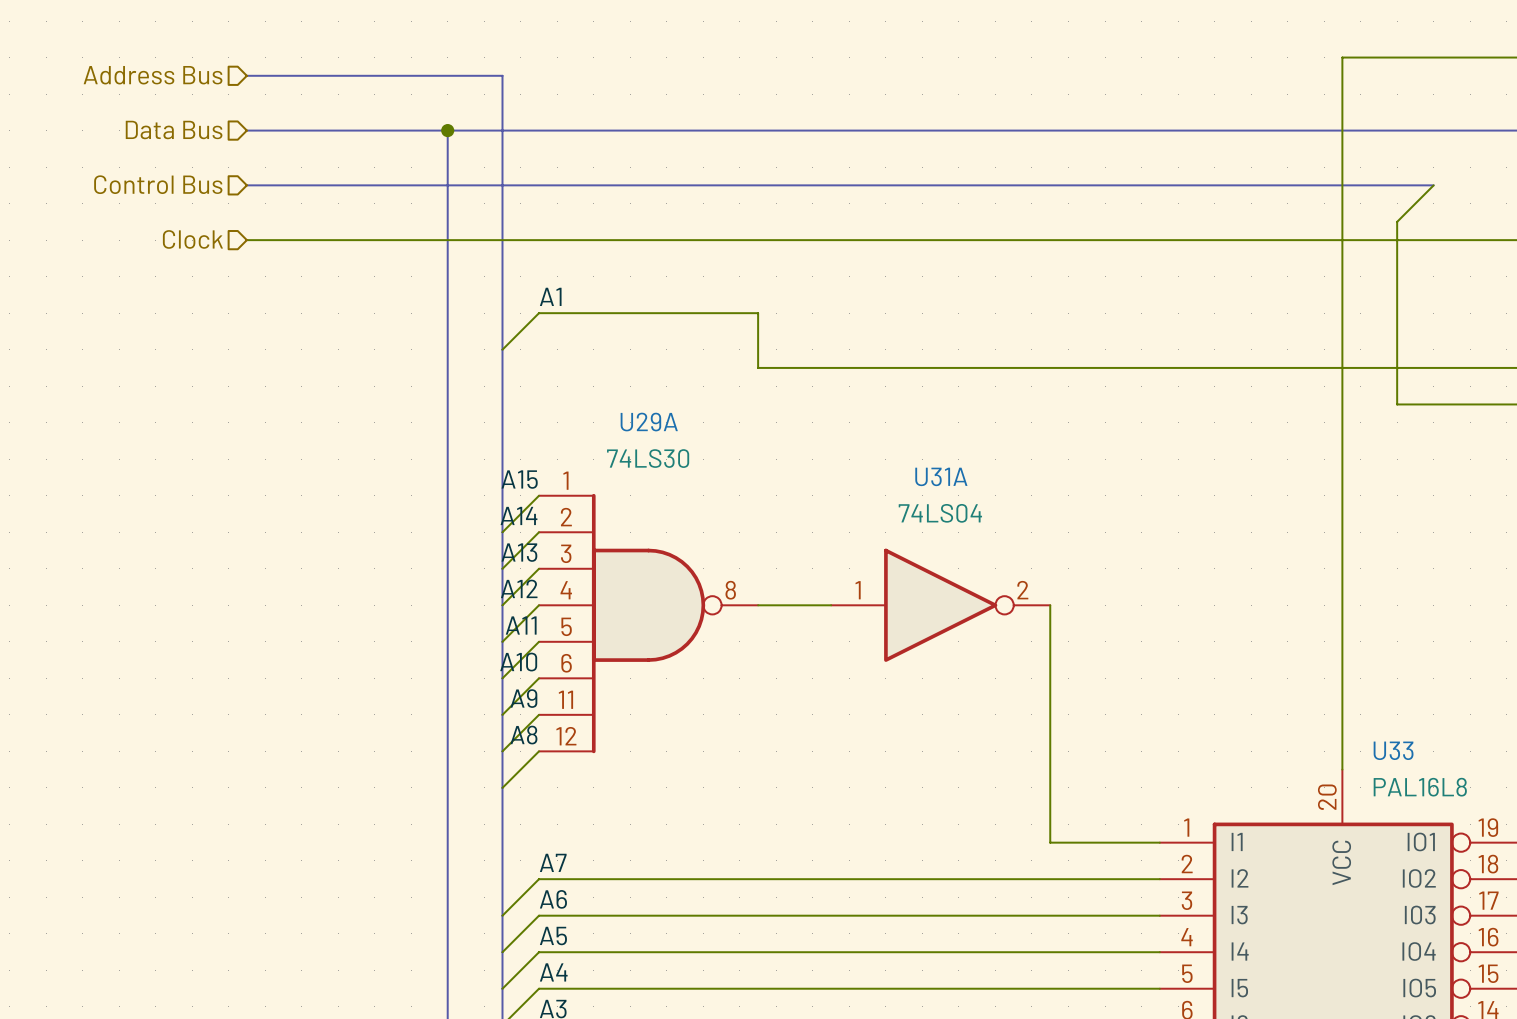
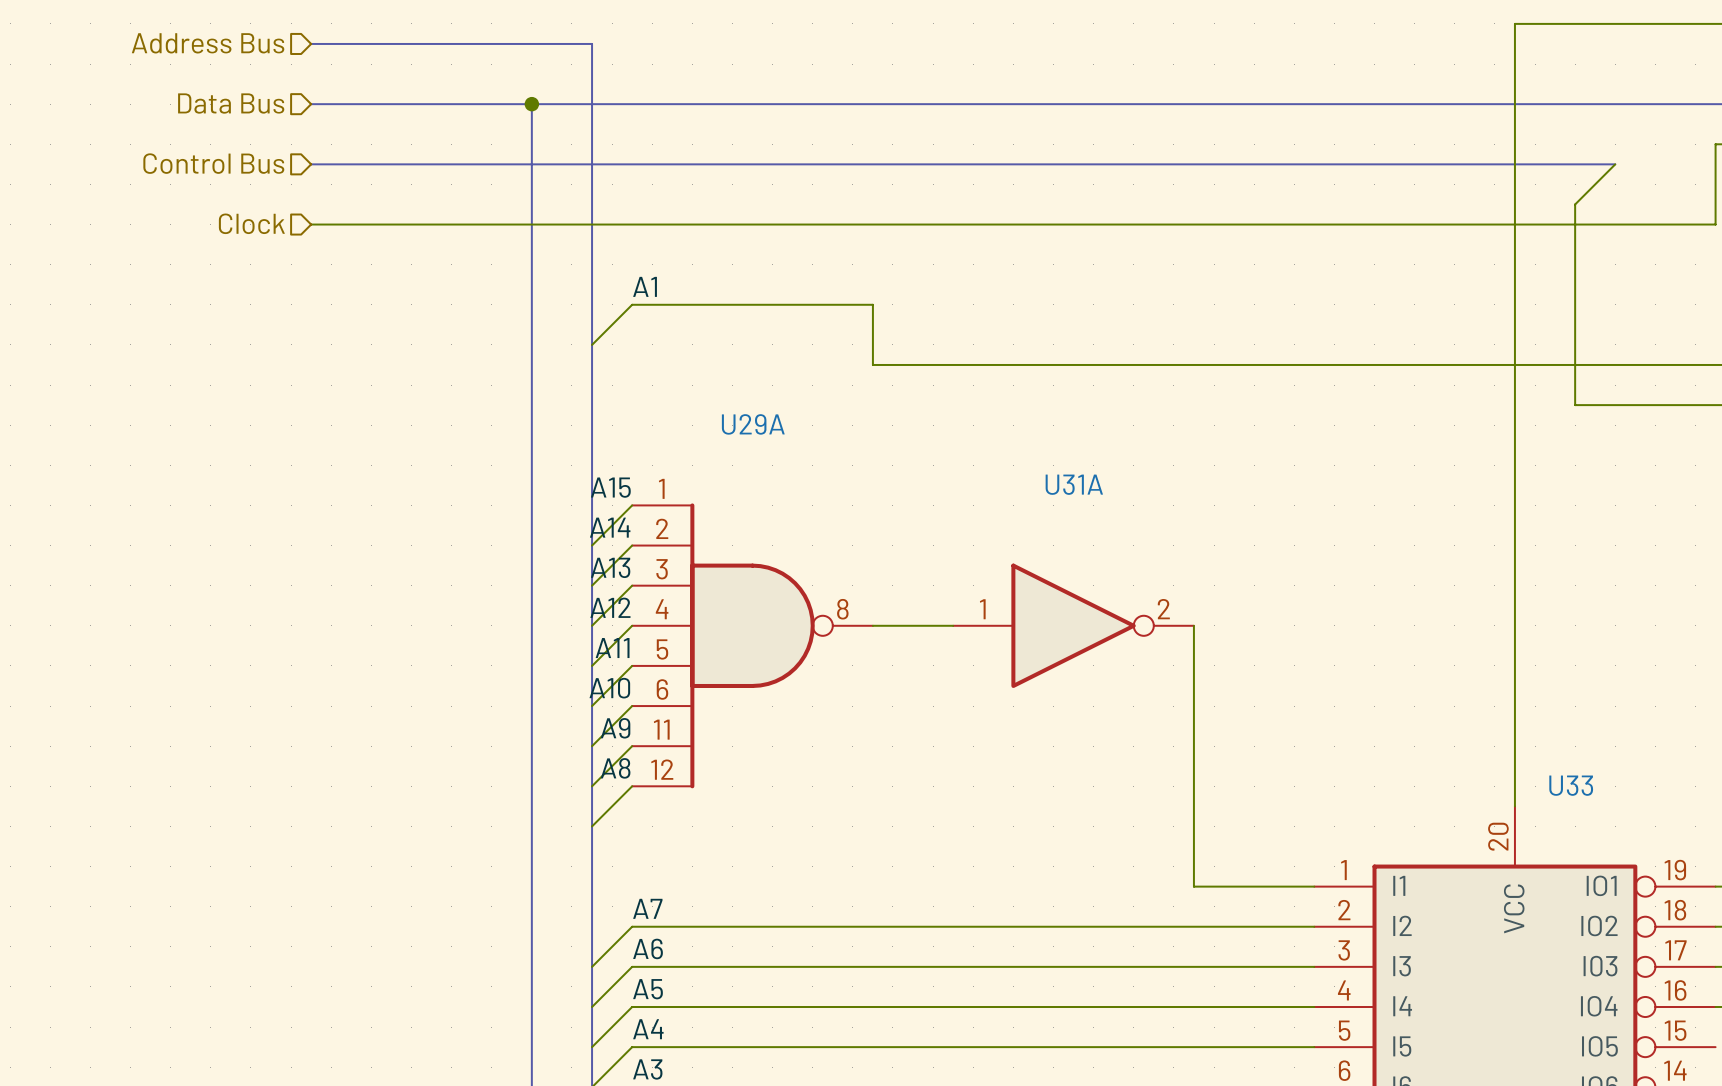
U29A value: 74LS30 (648, 458) -> none
U31A value: 74LS04 (940, 513) -> none
U33 value: PAL16L8 (1420, 787) -> none

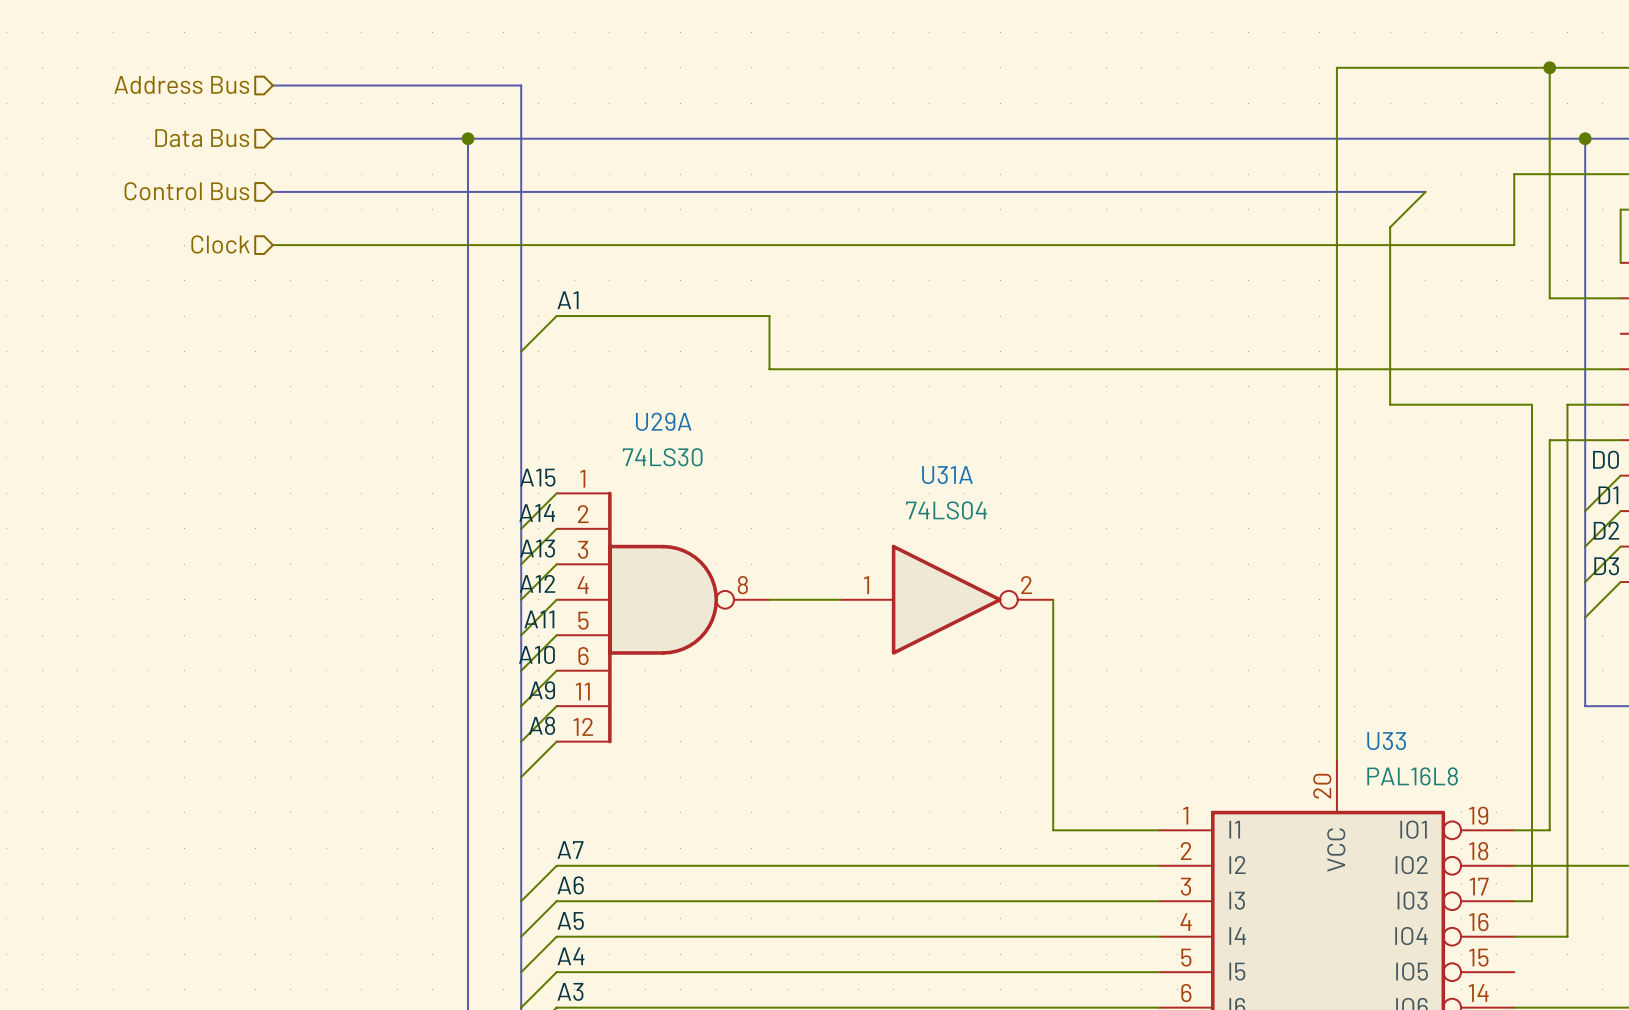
U29A value: none -> 74LS30 (662, 457)
U31A value: none -> 74LS04 (946, 510)
U33 value: none -> PAL16L8 (1412, 776)

